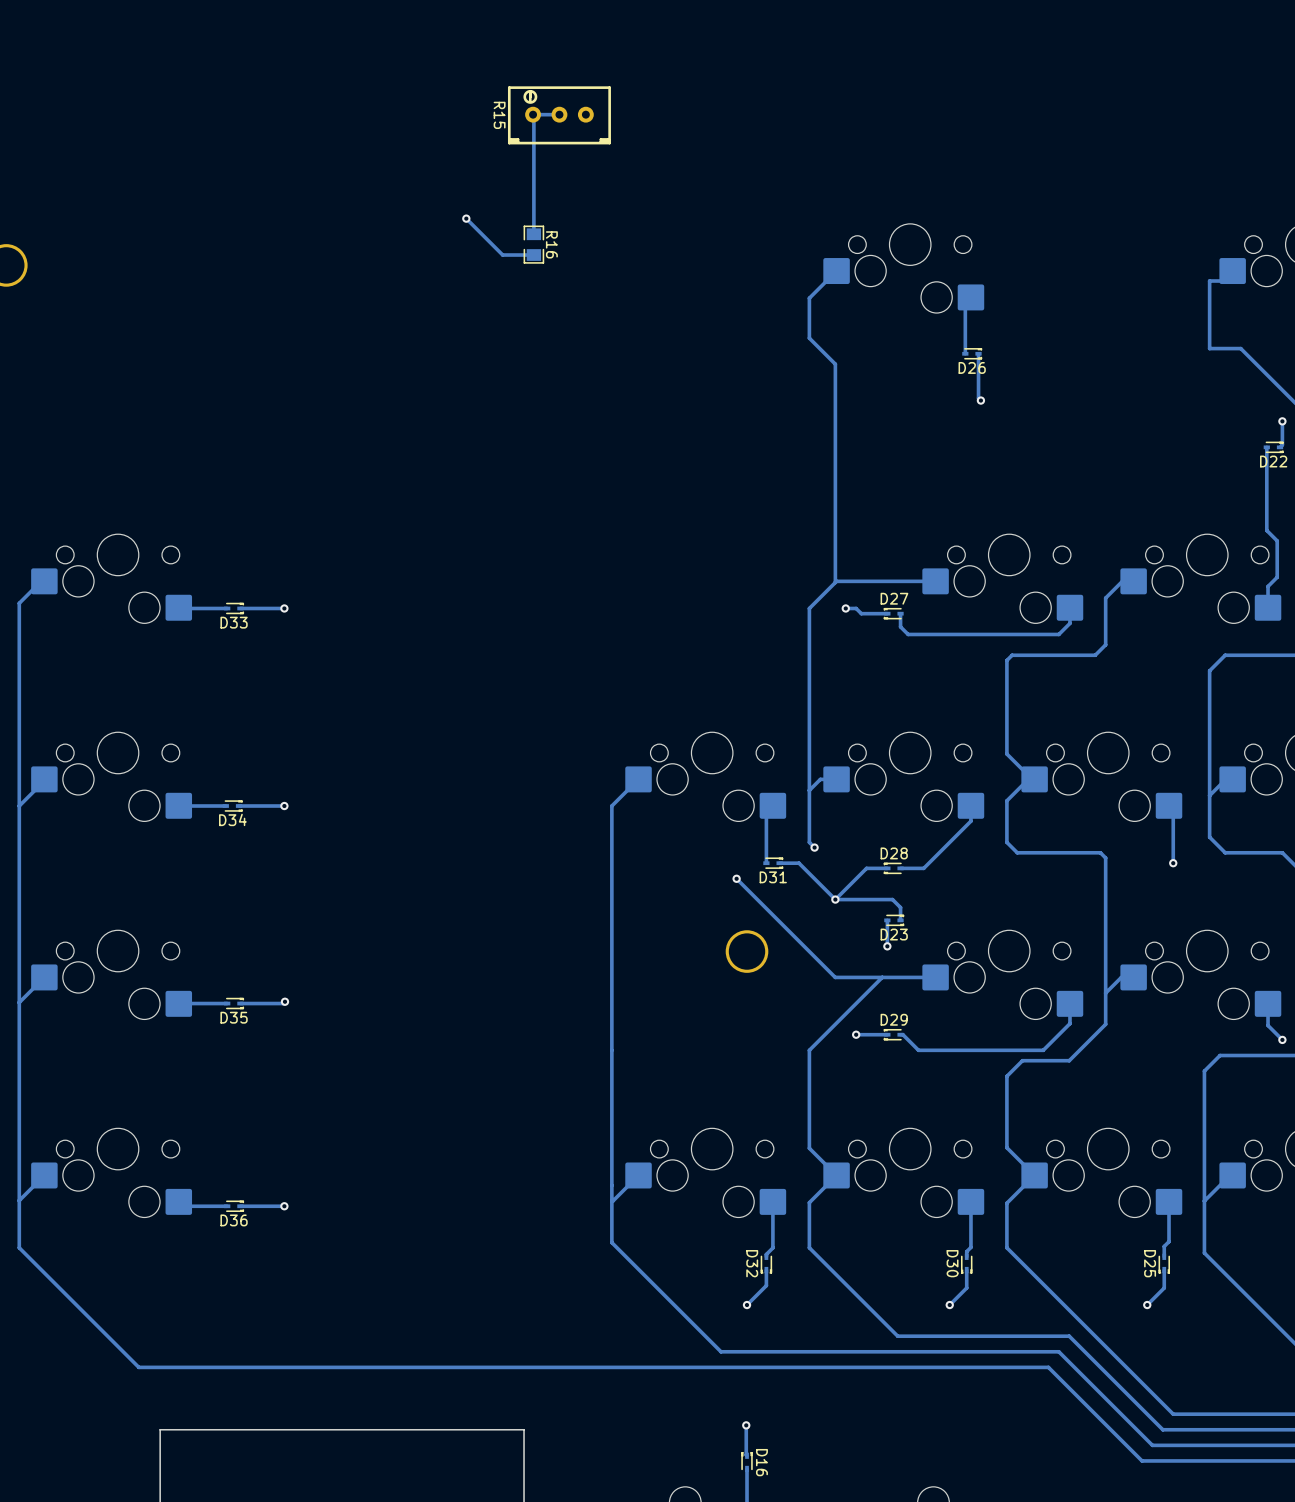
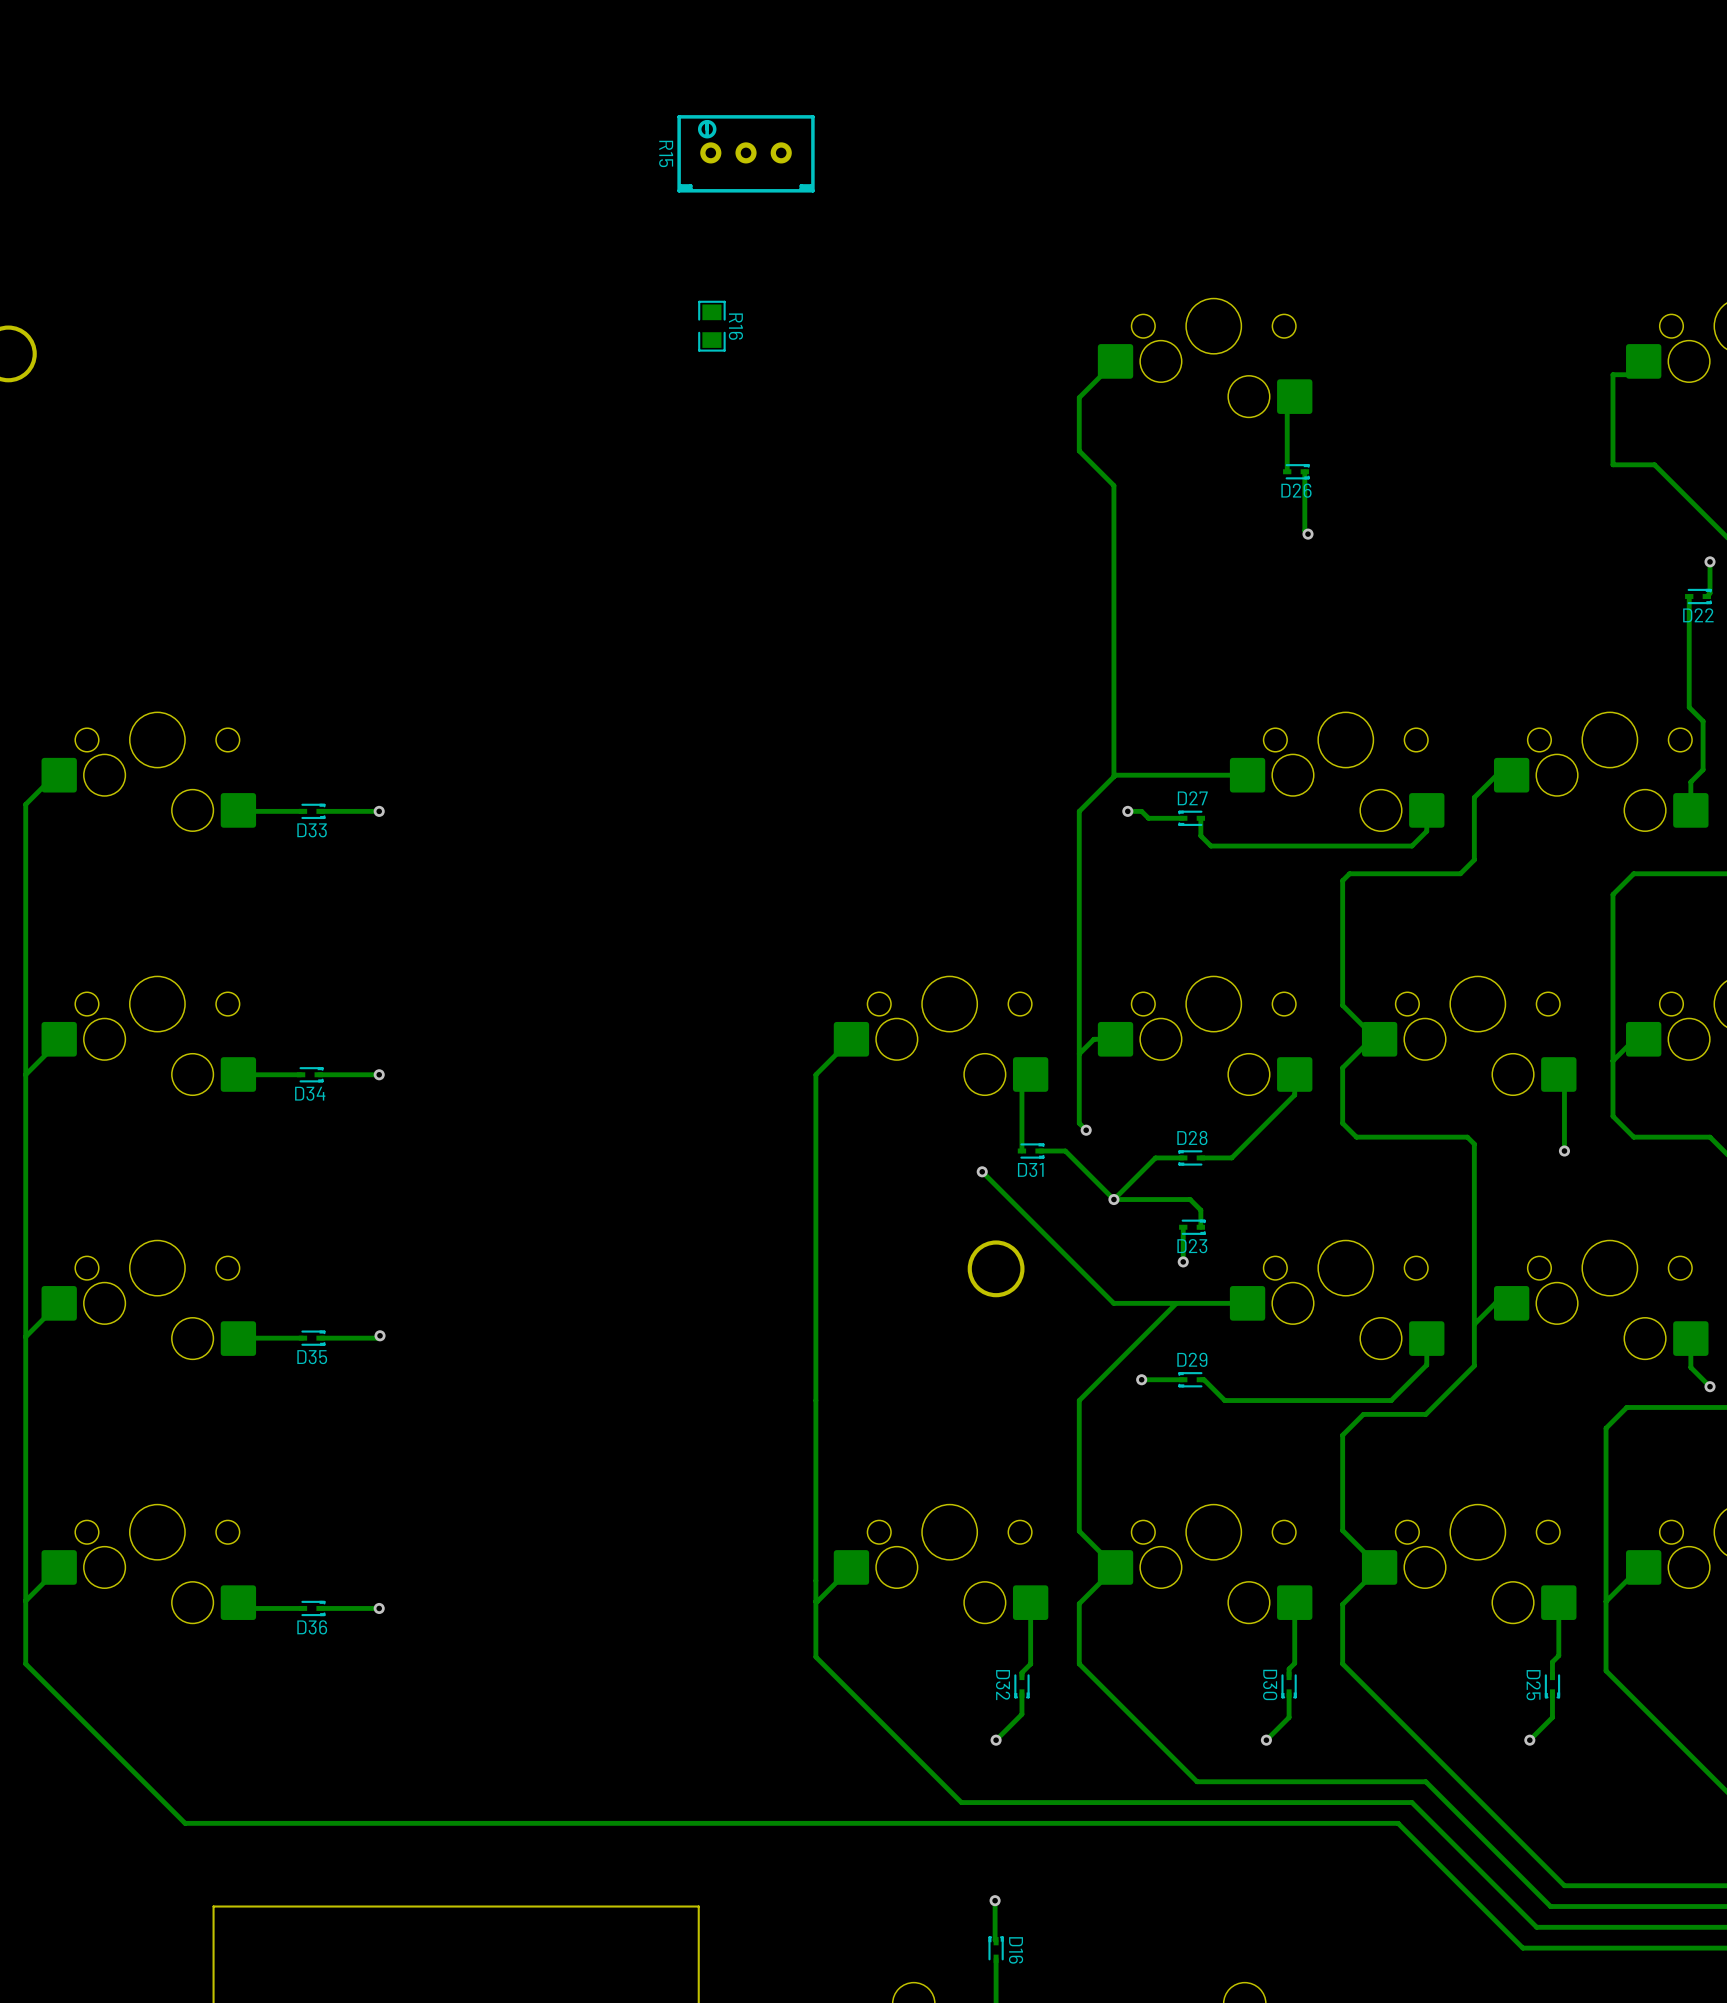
track: (559, 114) (533, 114) (533, 234) -> none
track: (466, 218) (502, 255) (533, 255) -> none
via: (466, 218) -> none

